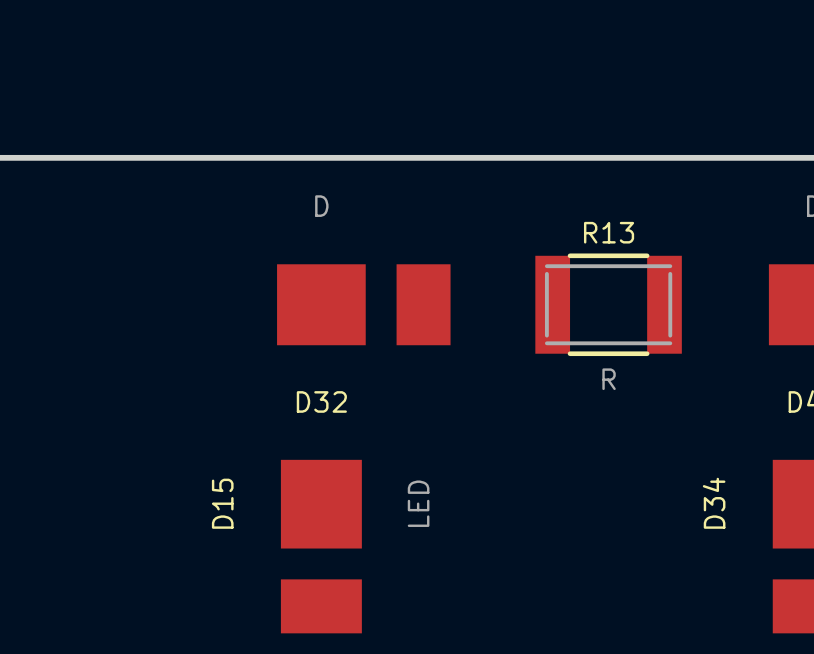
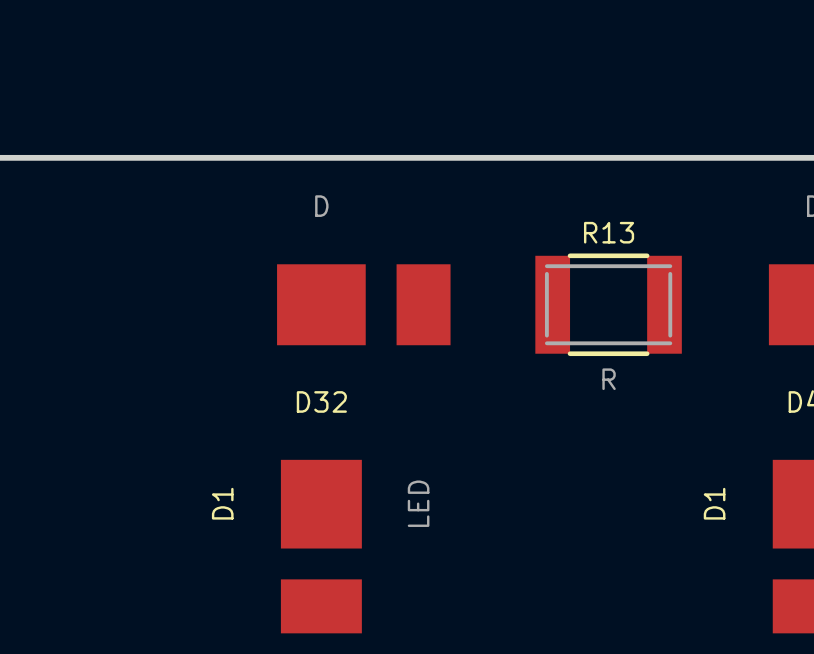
D15 name: D15 (222, 503) -> D1 (222, 503)
D34 name: D34 (714, 503) -> D1 (714, 503)

